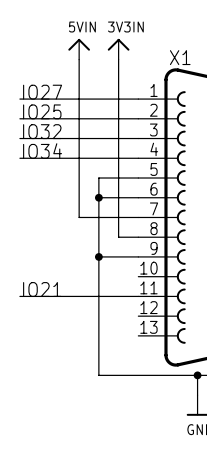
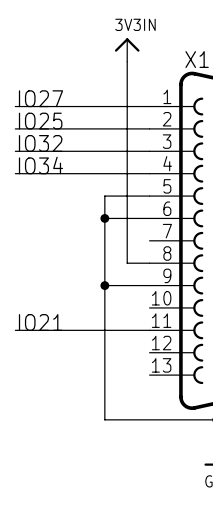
power symbol: 5VIN (79, 49) -> none
wire: (79, 59) (79, 217) (138, 217) -> none

